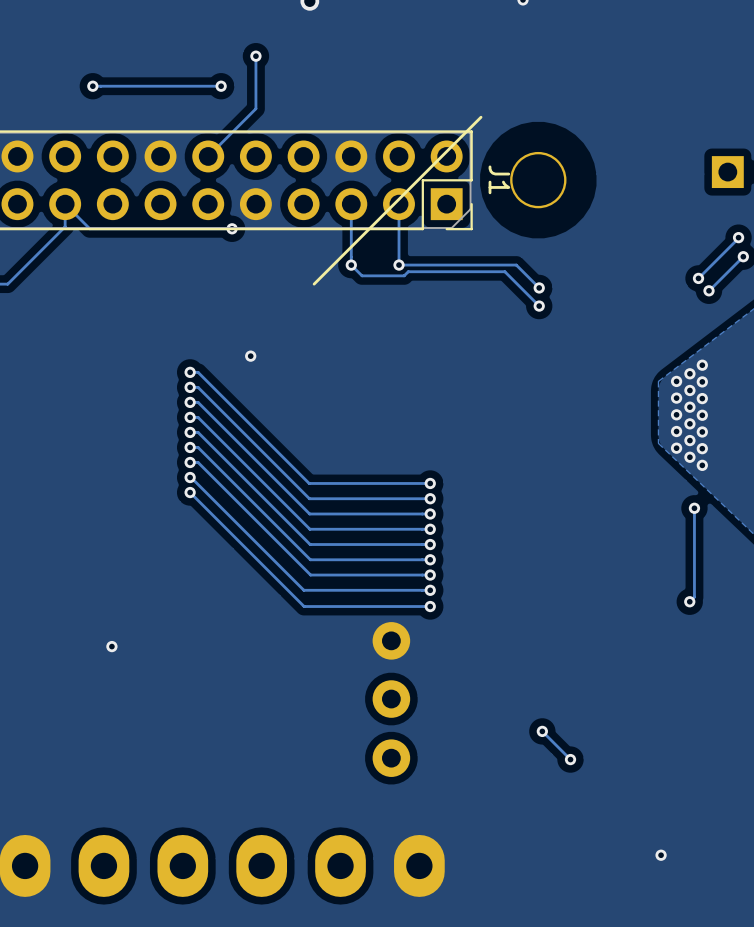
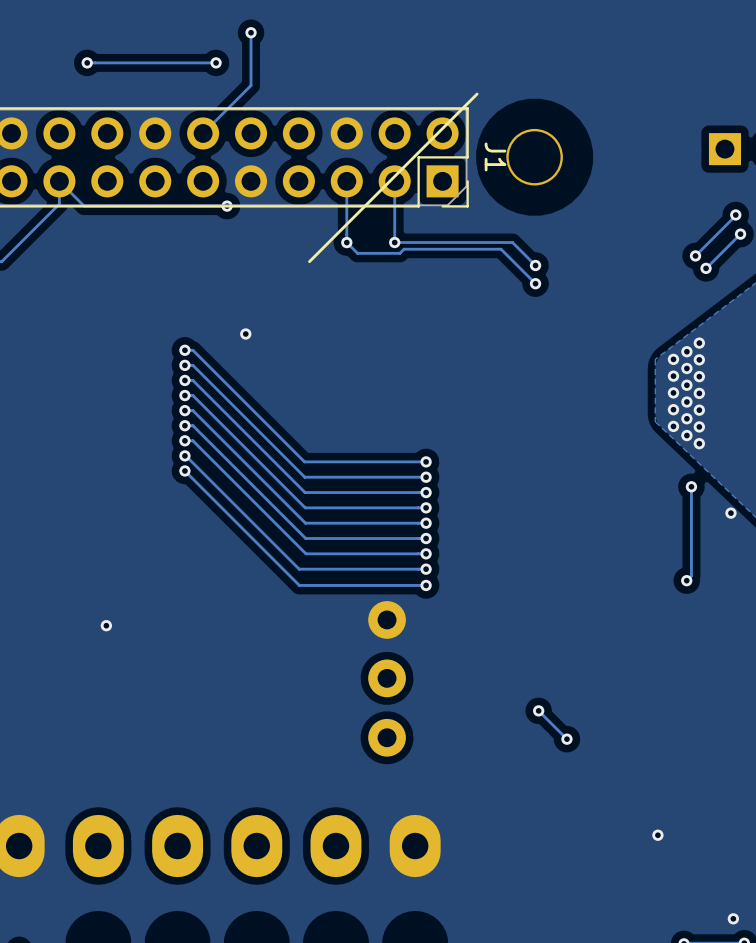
via: none -> (730, 513)

